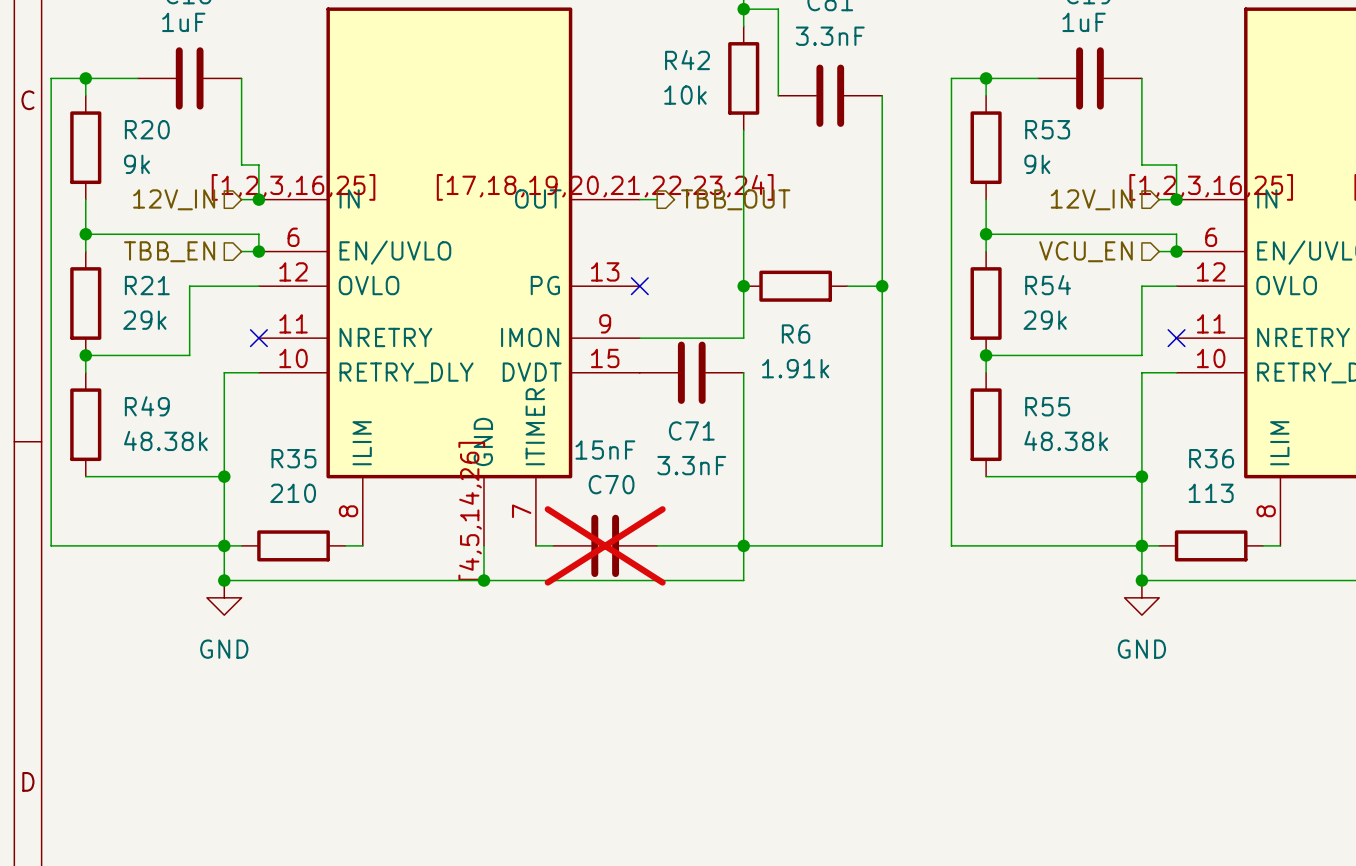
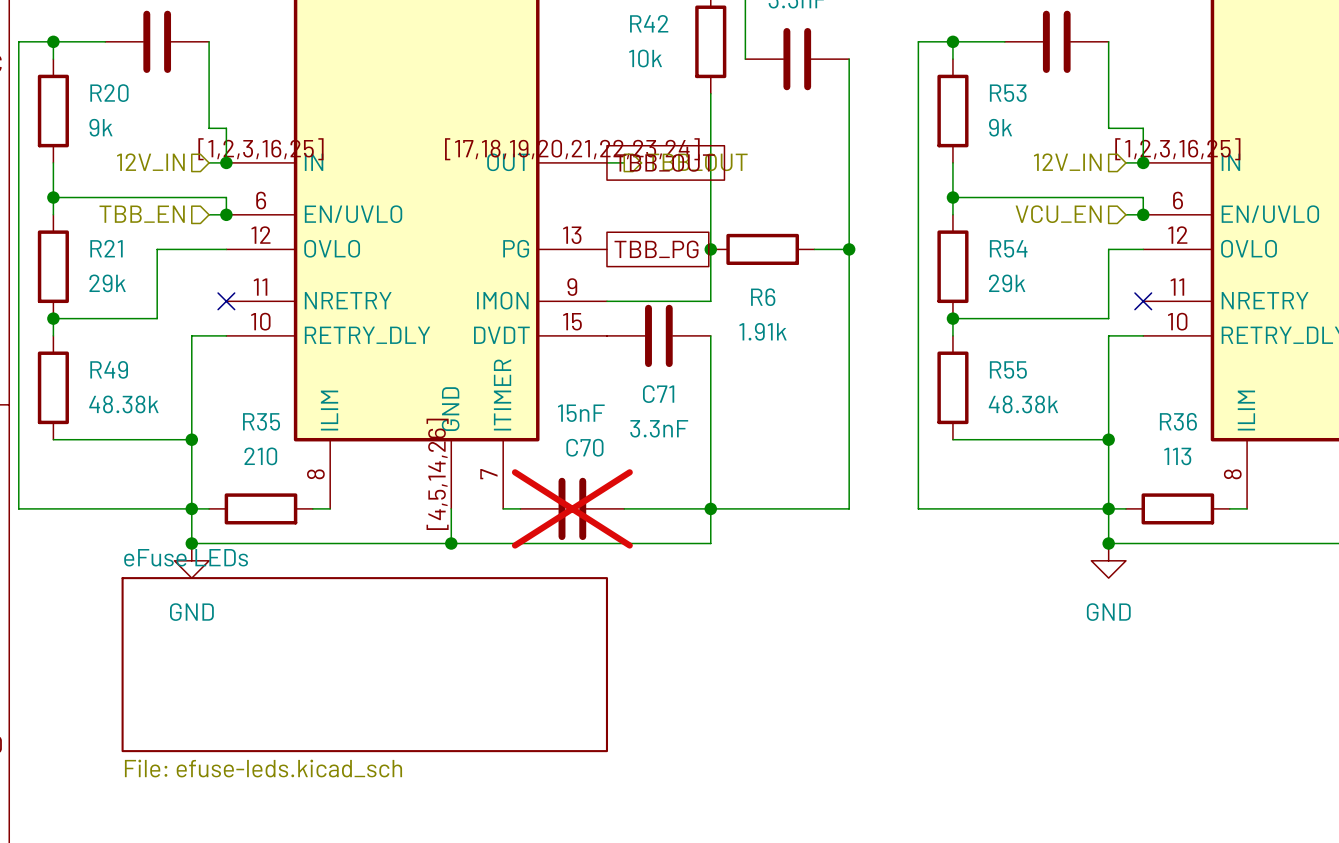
global label: none -> TBB_OUT (664, 162)
no-connect mark: (639, 286) -> none
global label: none -> TBB_PG (656, 249)
sheet eFuse LEDs: none -> File: efuse-leds.kicad_sch (364, 664)

